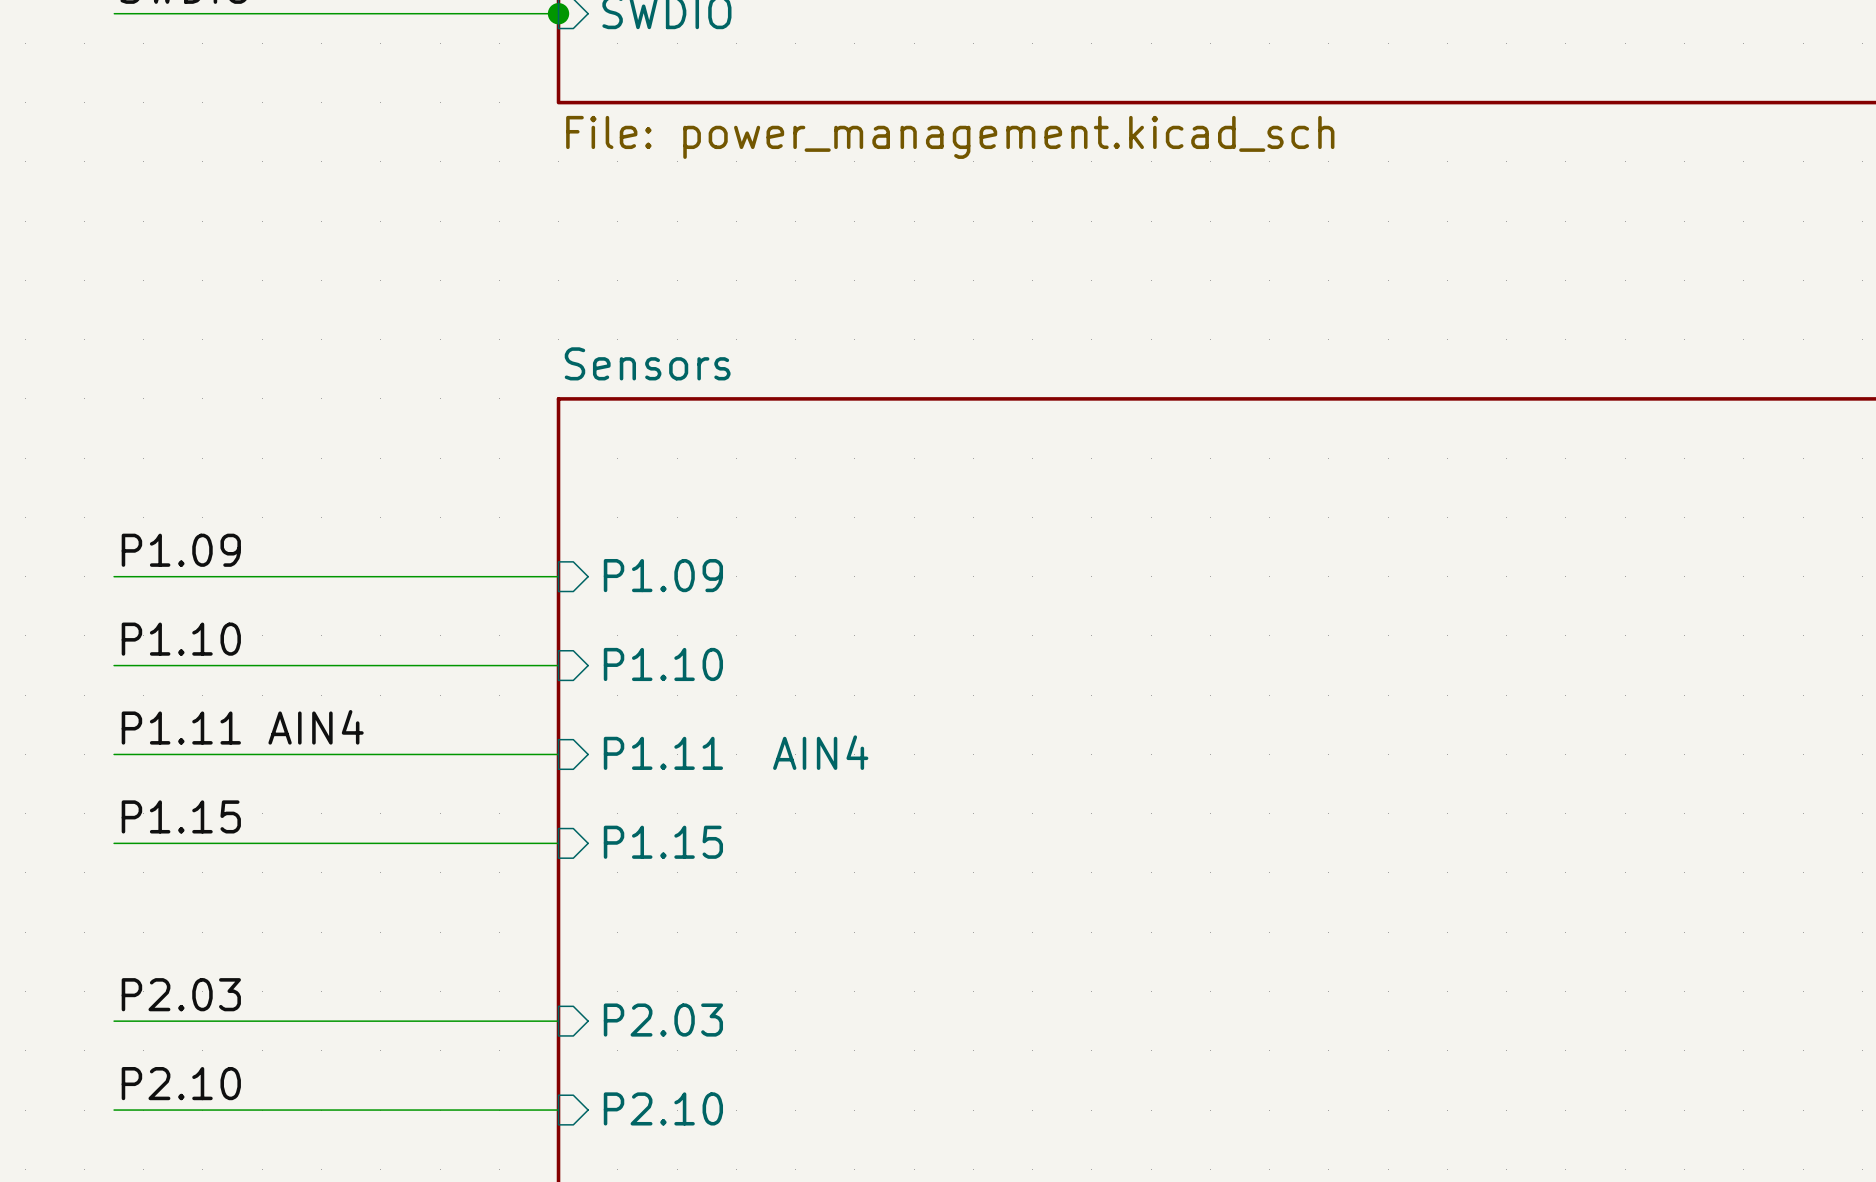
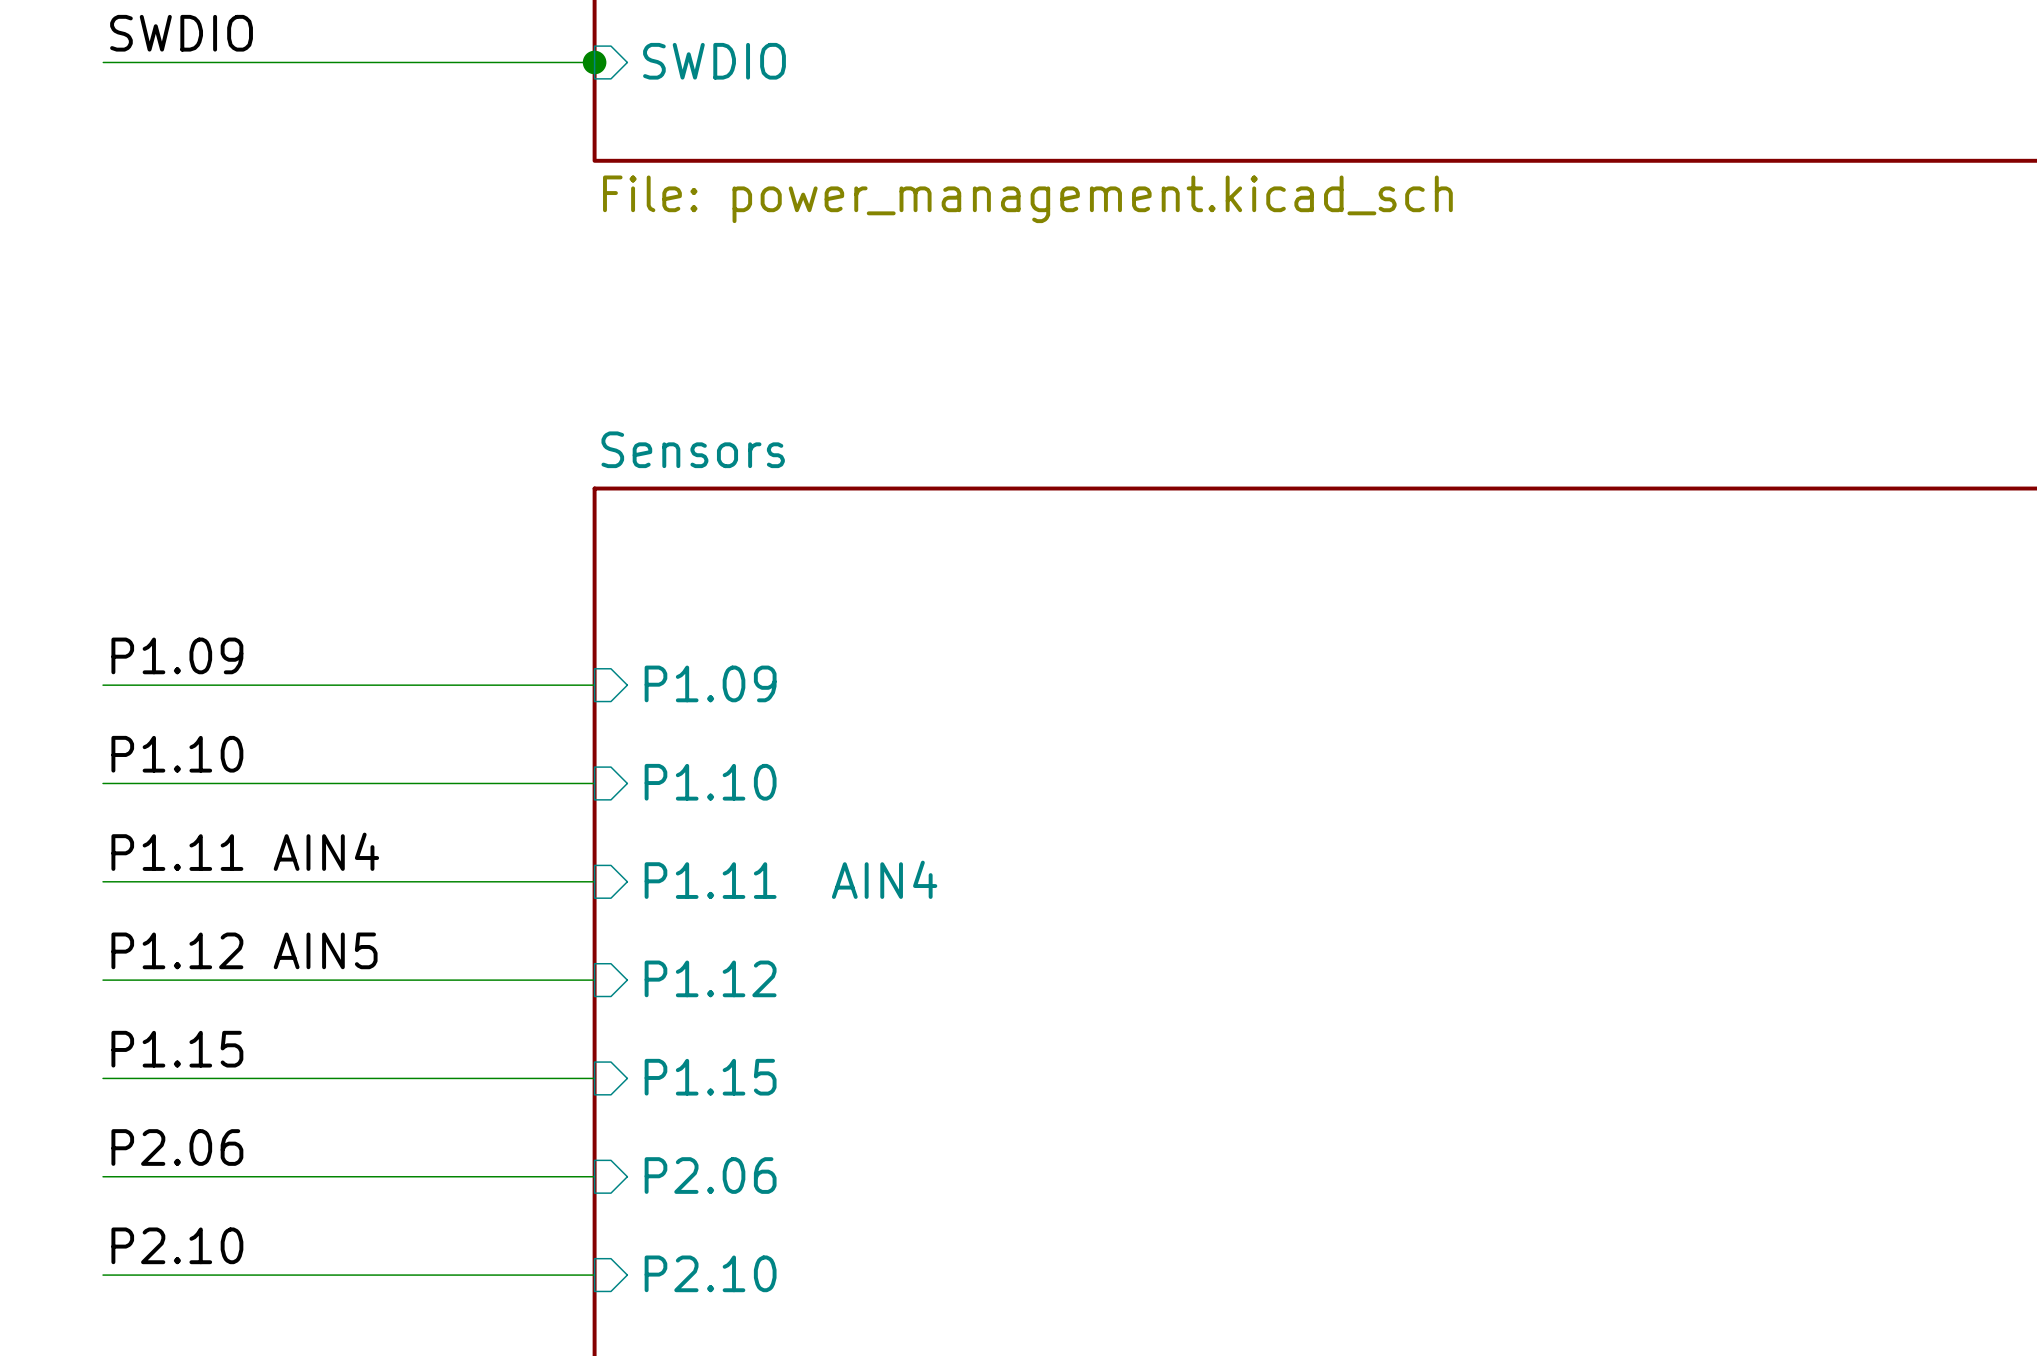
label: P1.15 (181, 816) -> P1.12 AIN5 (244, 950)
sheet pin: P1.15 (663, 842) -> P1.12 (710, 978)
label: none -> P1.15 (177, 1049)
sheet pin: none -> P1.15 (710, 1077)
wire: none -> (103, 1078) (594, 1078)
label: P2.03 (181, 994) -> P2.06 (177, 1147)
sheet pin: P2.03 (663, 1020) -> P2.06 (710, 1175)

